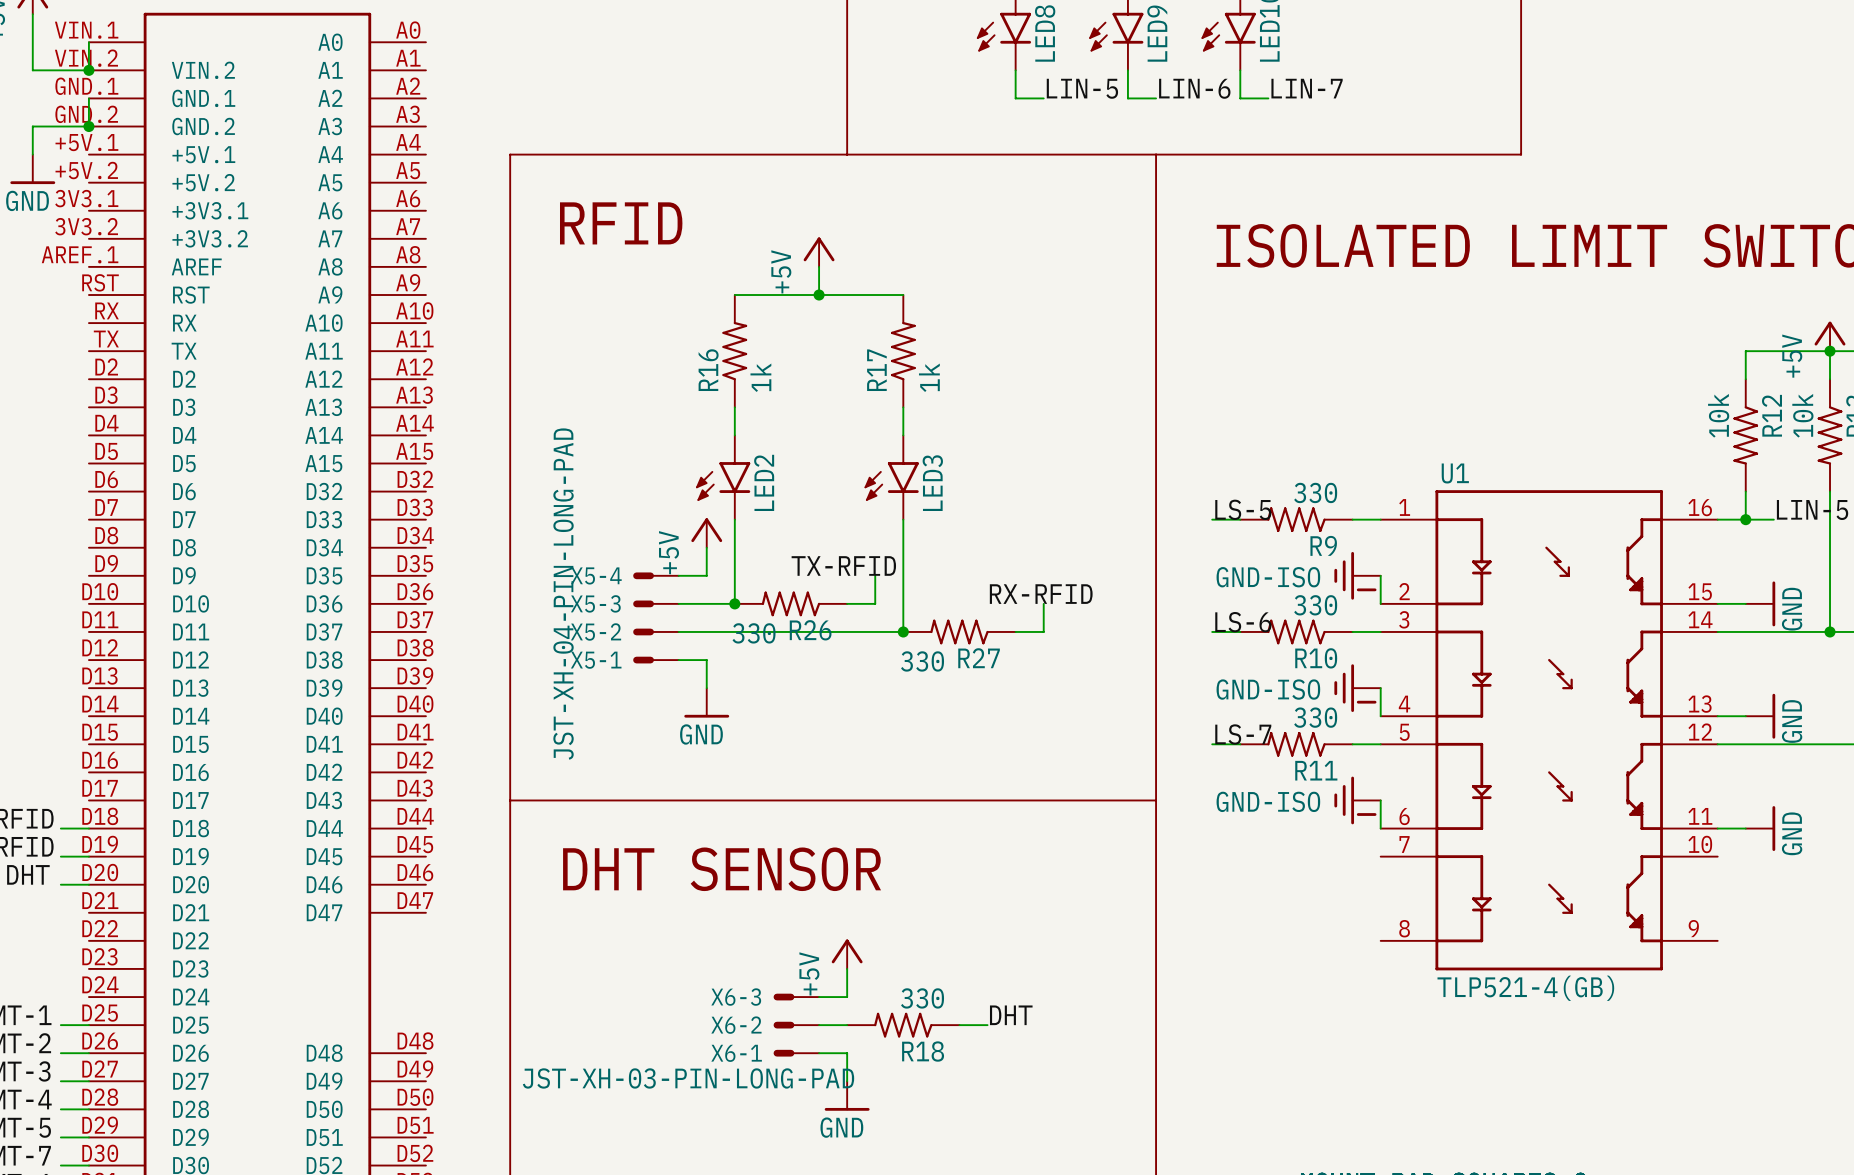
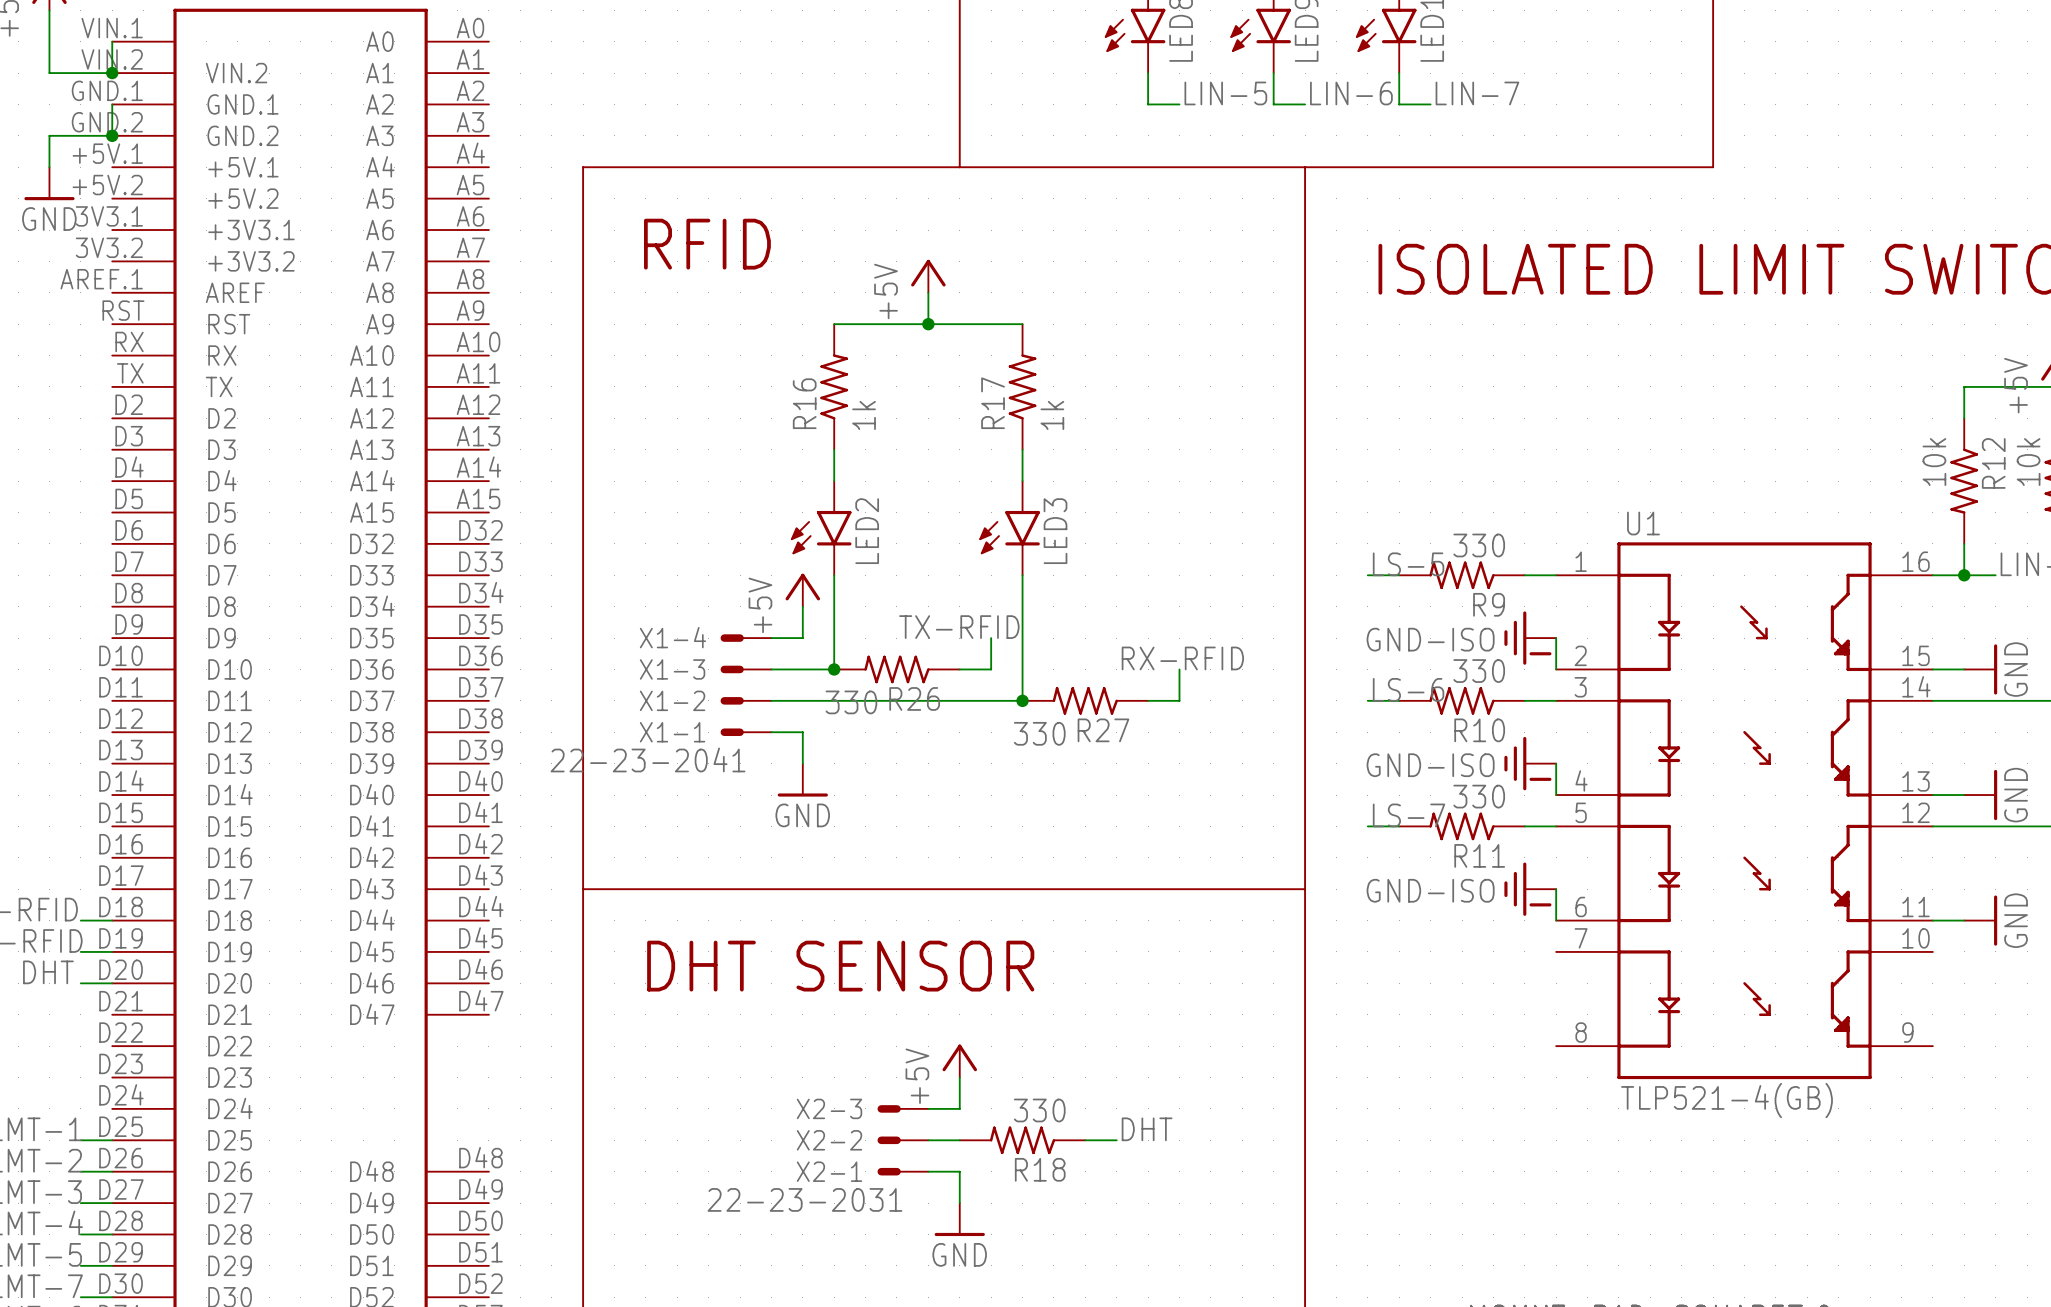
X5-4 name: X5-4 (596, 575) -> X1-4 (672, 637)
X5-1 value: JST-XH-04-PIN-LONG-PAD (563, 594) -> 22-23-2041 (648, 759)
X5-3 name: X5-3 (595, 603) -> X1-3 (672, 669)
X5-2 name: X5-2 (596, 631) -> X1-2 (672, 700)
X5-1 name: X5-1 (596, 660) -> X1-1 (672, 732)
X6-3 name: X6-3 (736, 997) -> X2-3 (829, 1108)
X6-2 name: X6-2 (736, 1025) -> X2-2 (829, 1140)
X6-1 name: X6-1 (736, 1053) -> X2-1 (829, 1171)
X6-1 value: JST-XH-03-PIN-LONG-PAD (688, 1078) -> 22-23-2031 (804, 1199)

